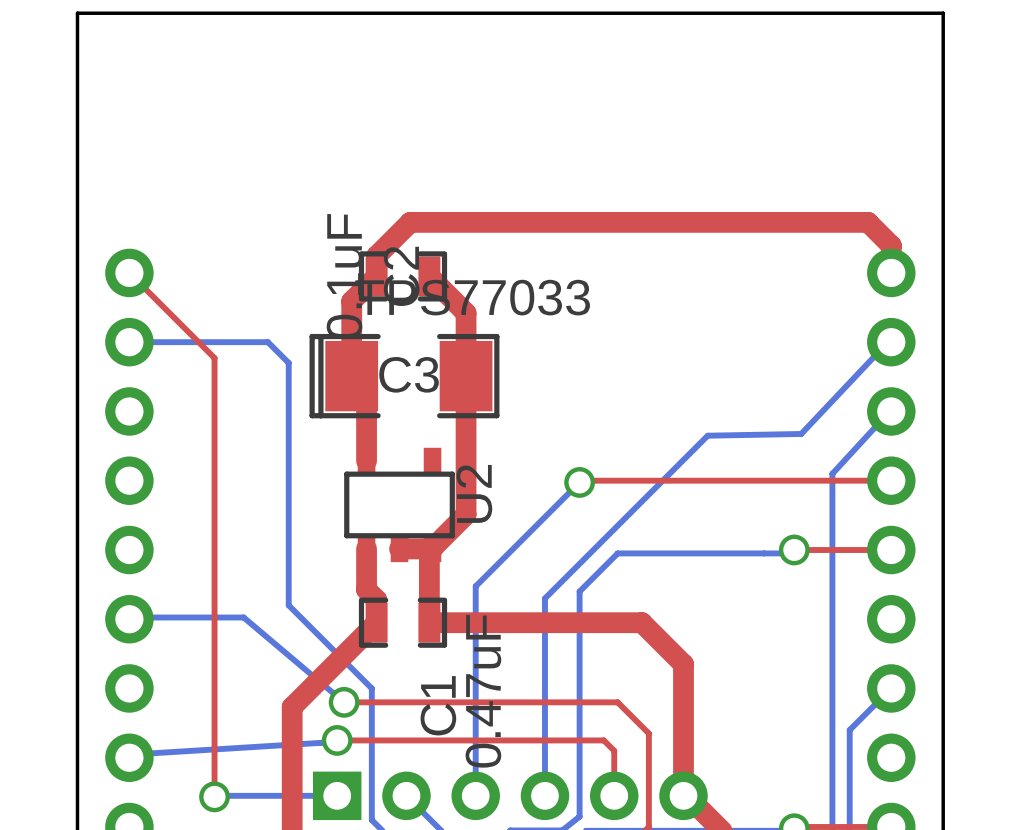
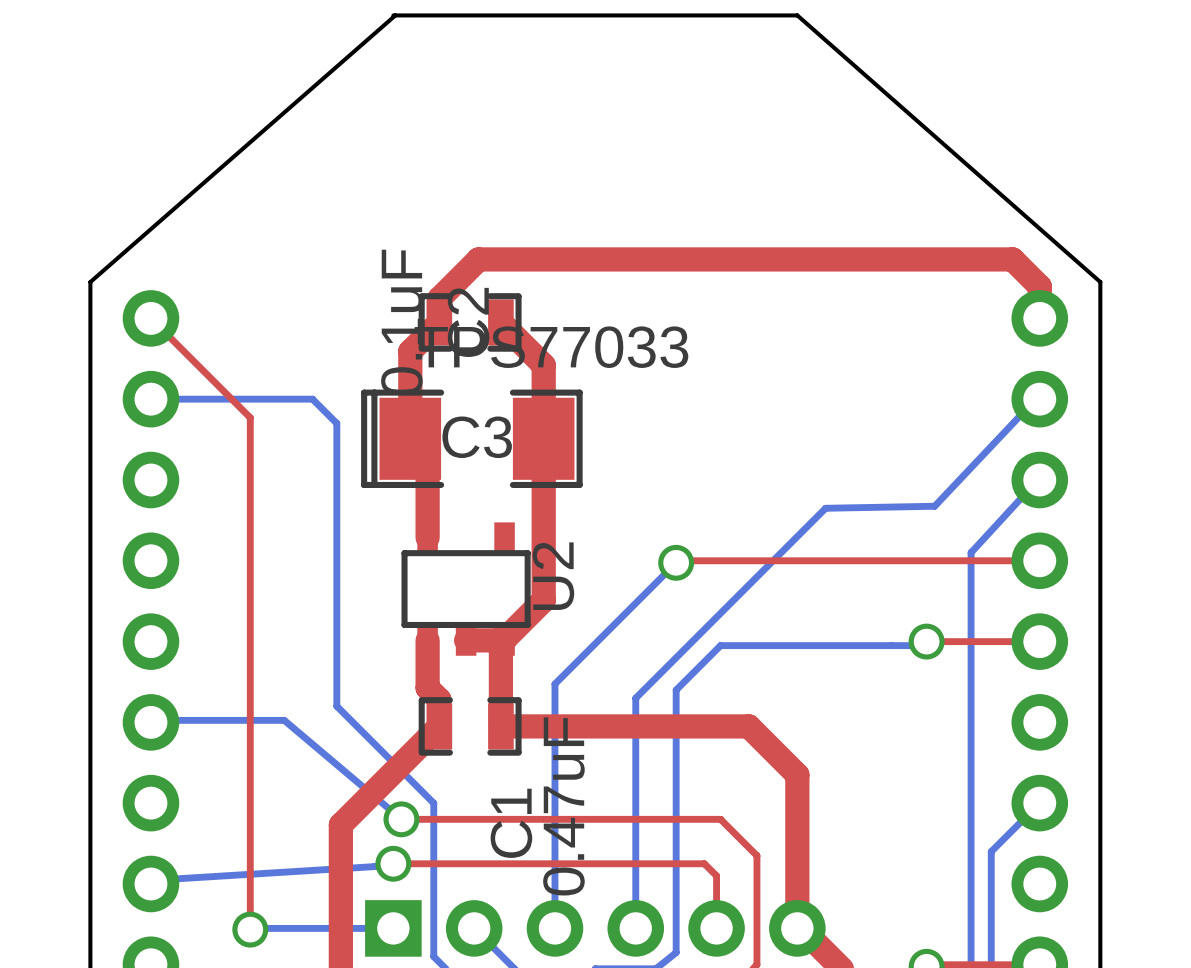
board edge: (337, 13) (77, 13) (77, 241) -> (395, 15) (90, 282)
board edge: (683, 13) (943, 13) (943, 241) -> (797, 15) (1100, 282)

